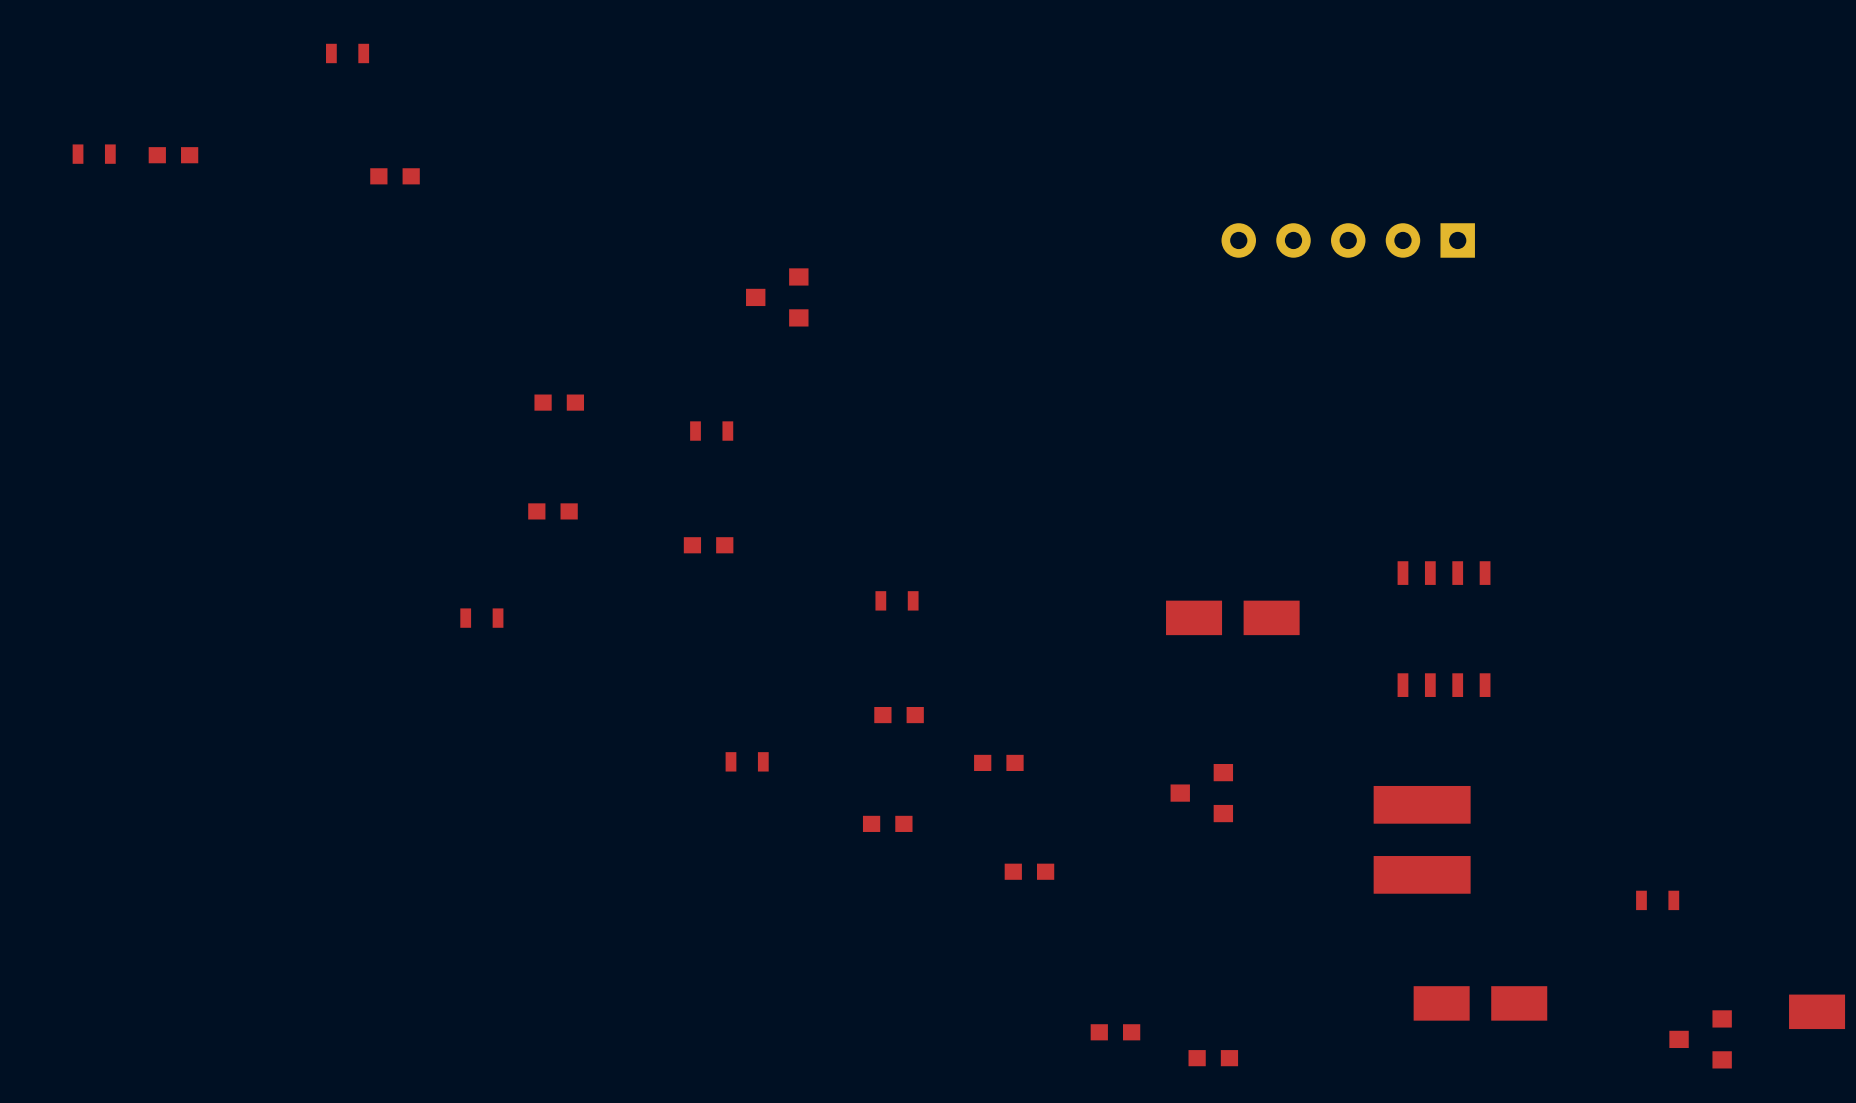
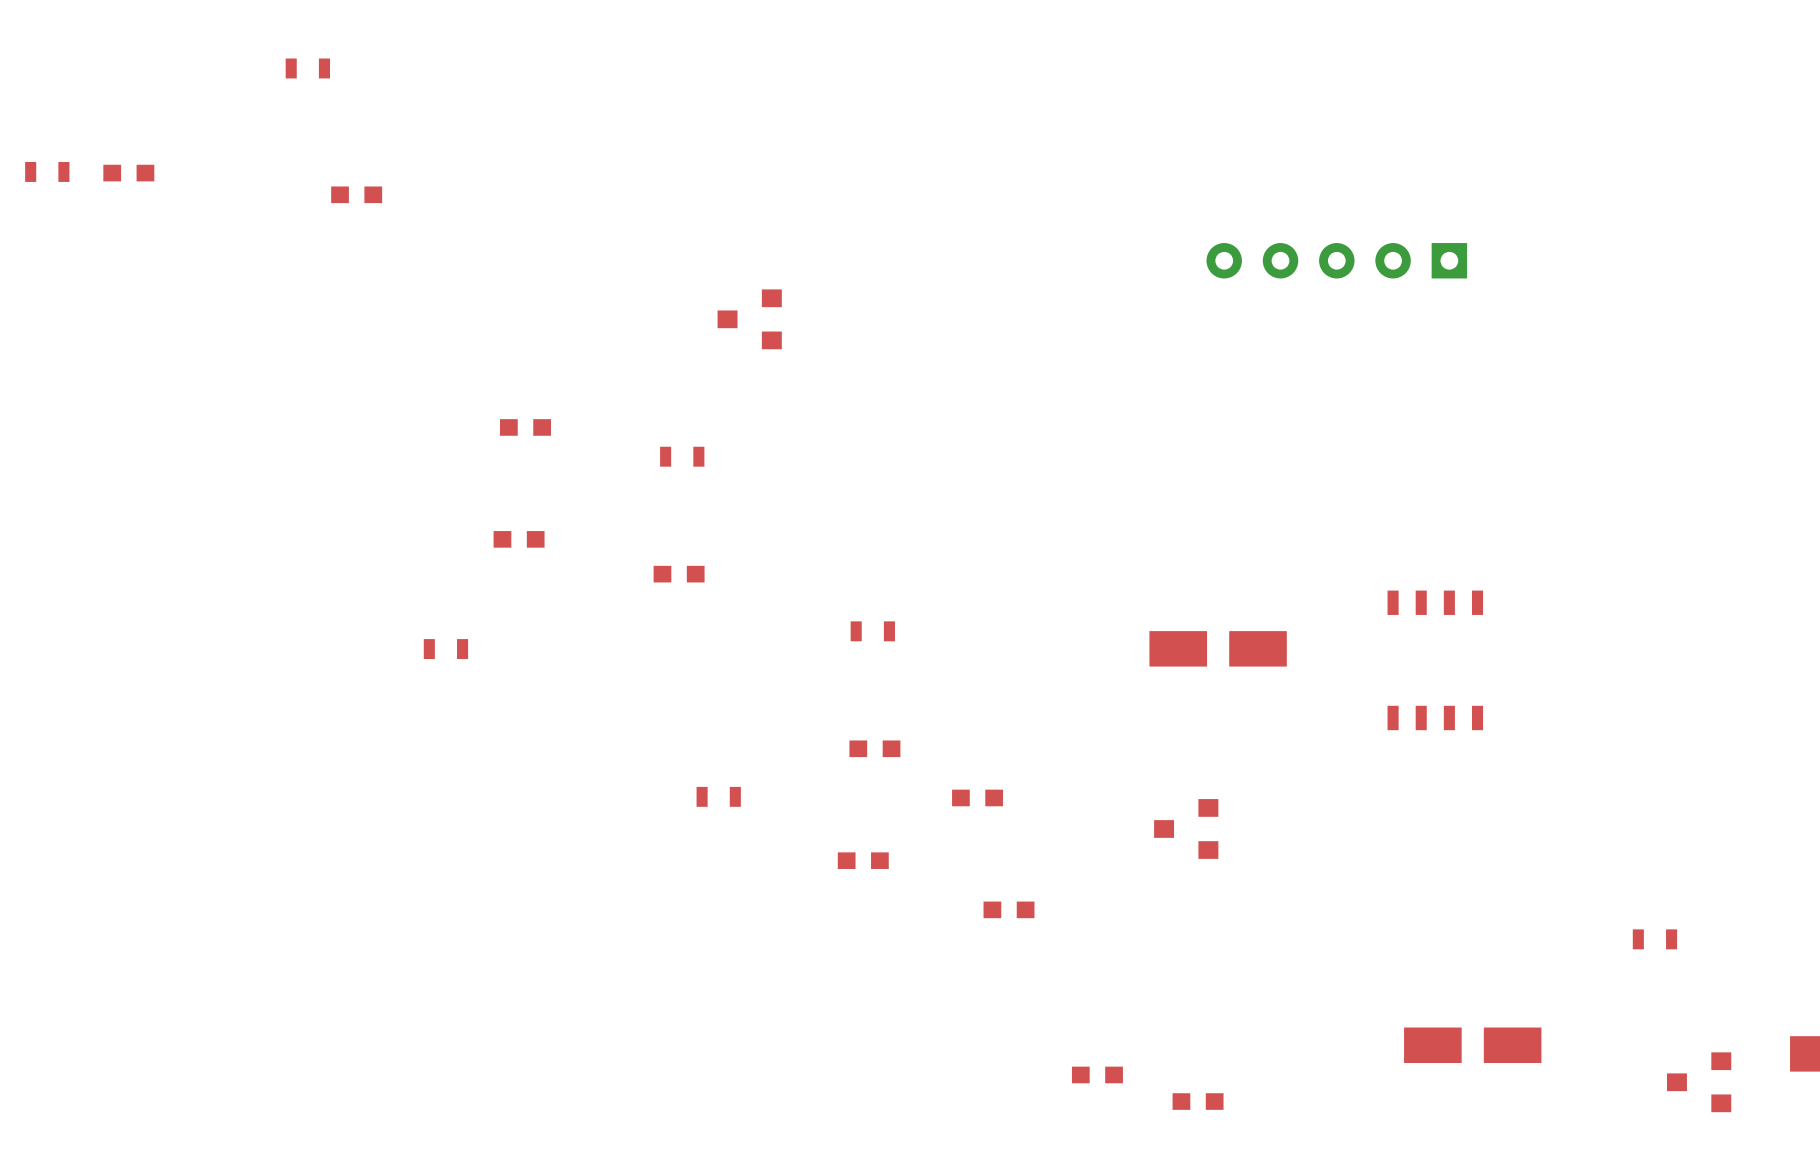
part: (1422, 839) -> none

